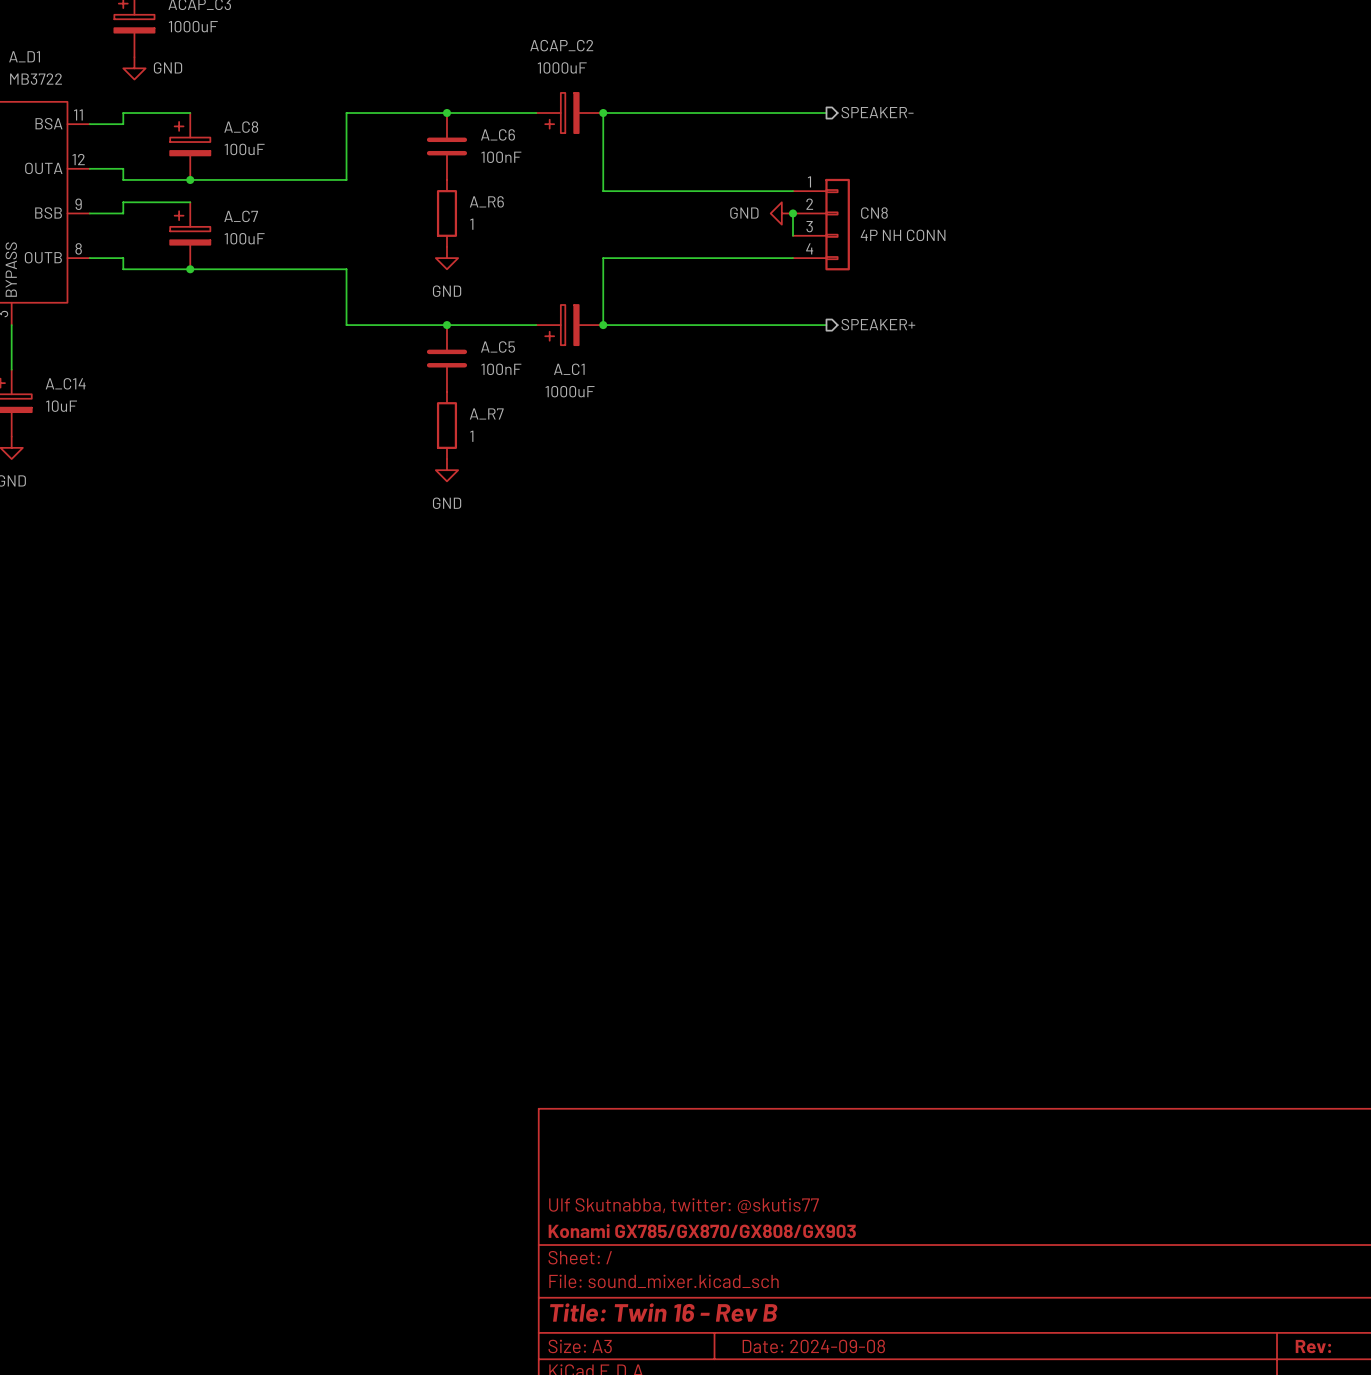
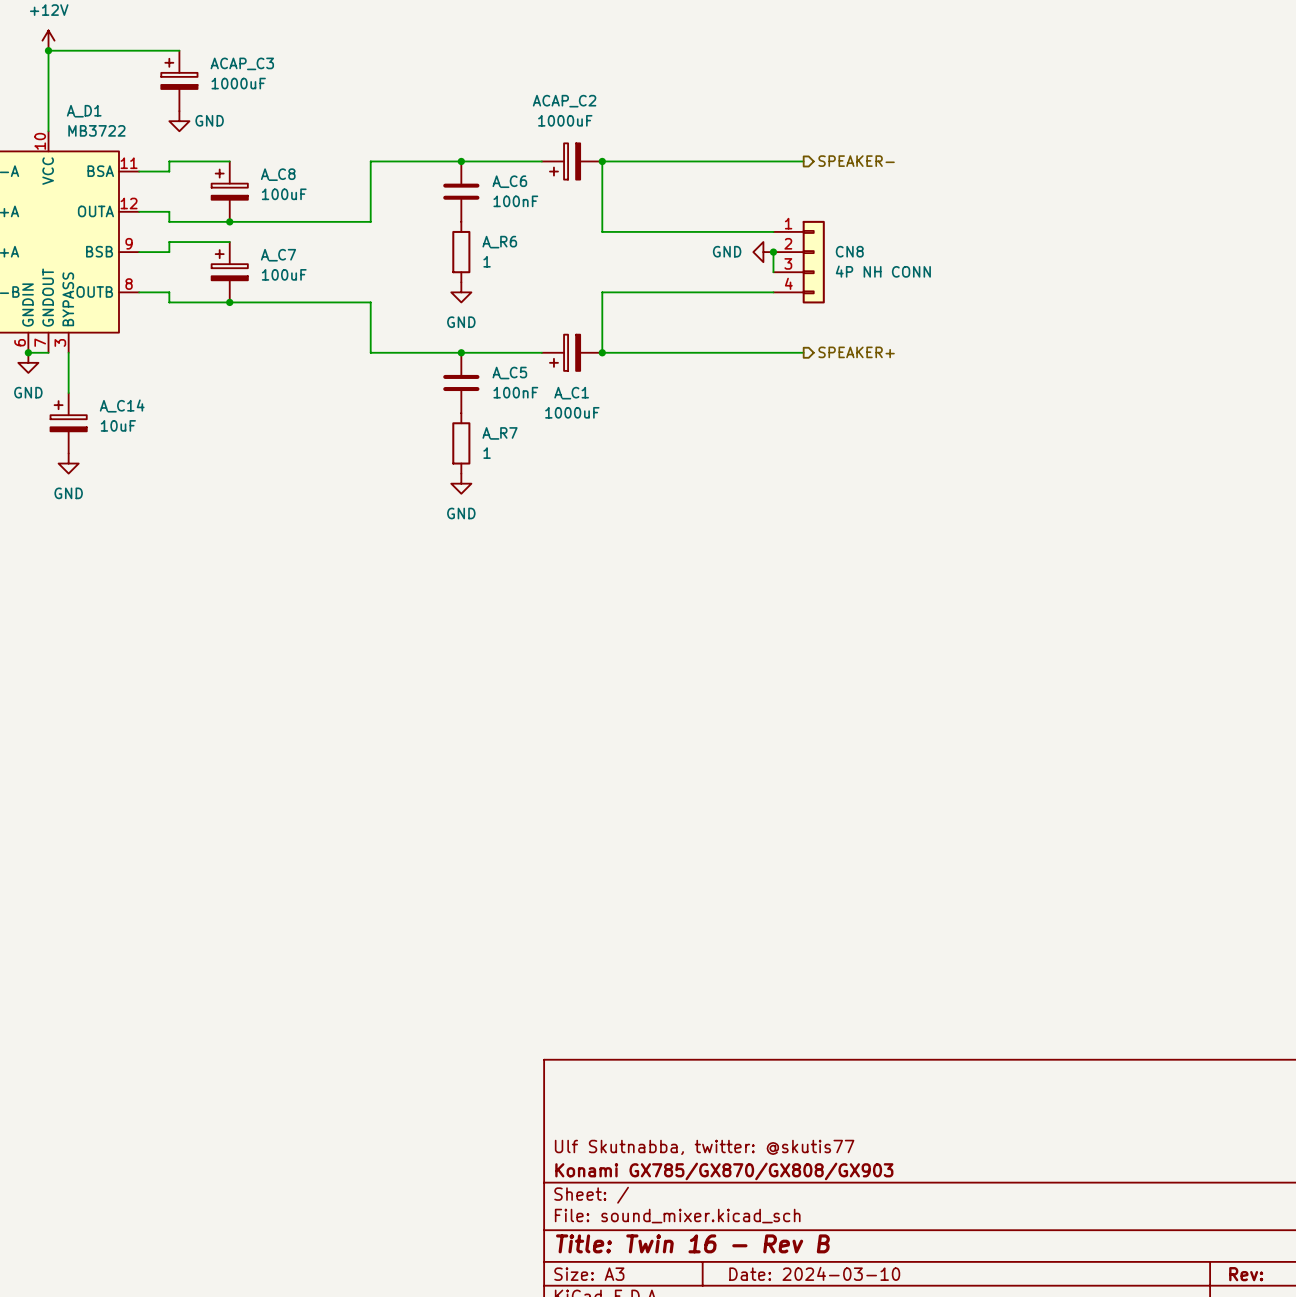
title block: Date: 2024-09-08 (813, 1346) -> Date: 2024-03-10 (814, 1273)

